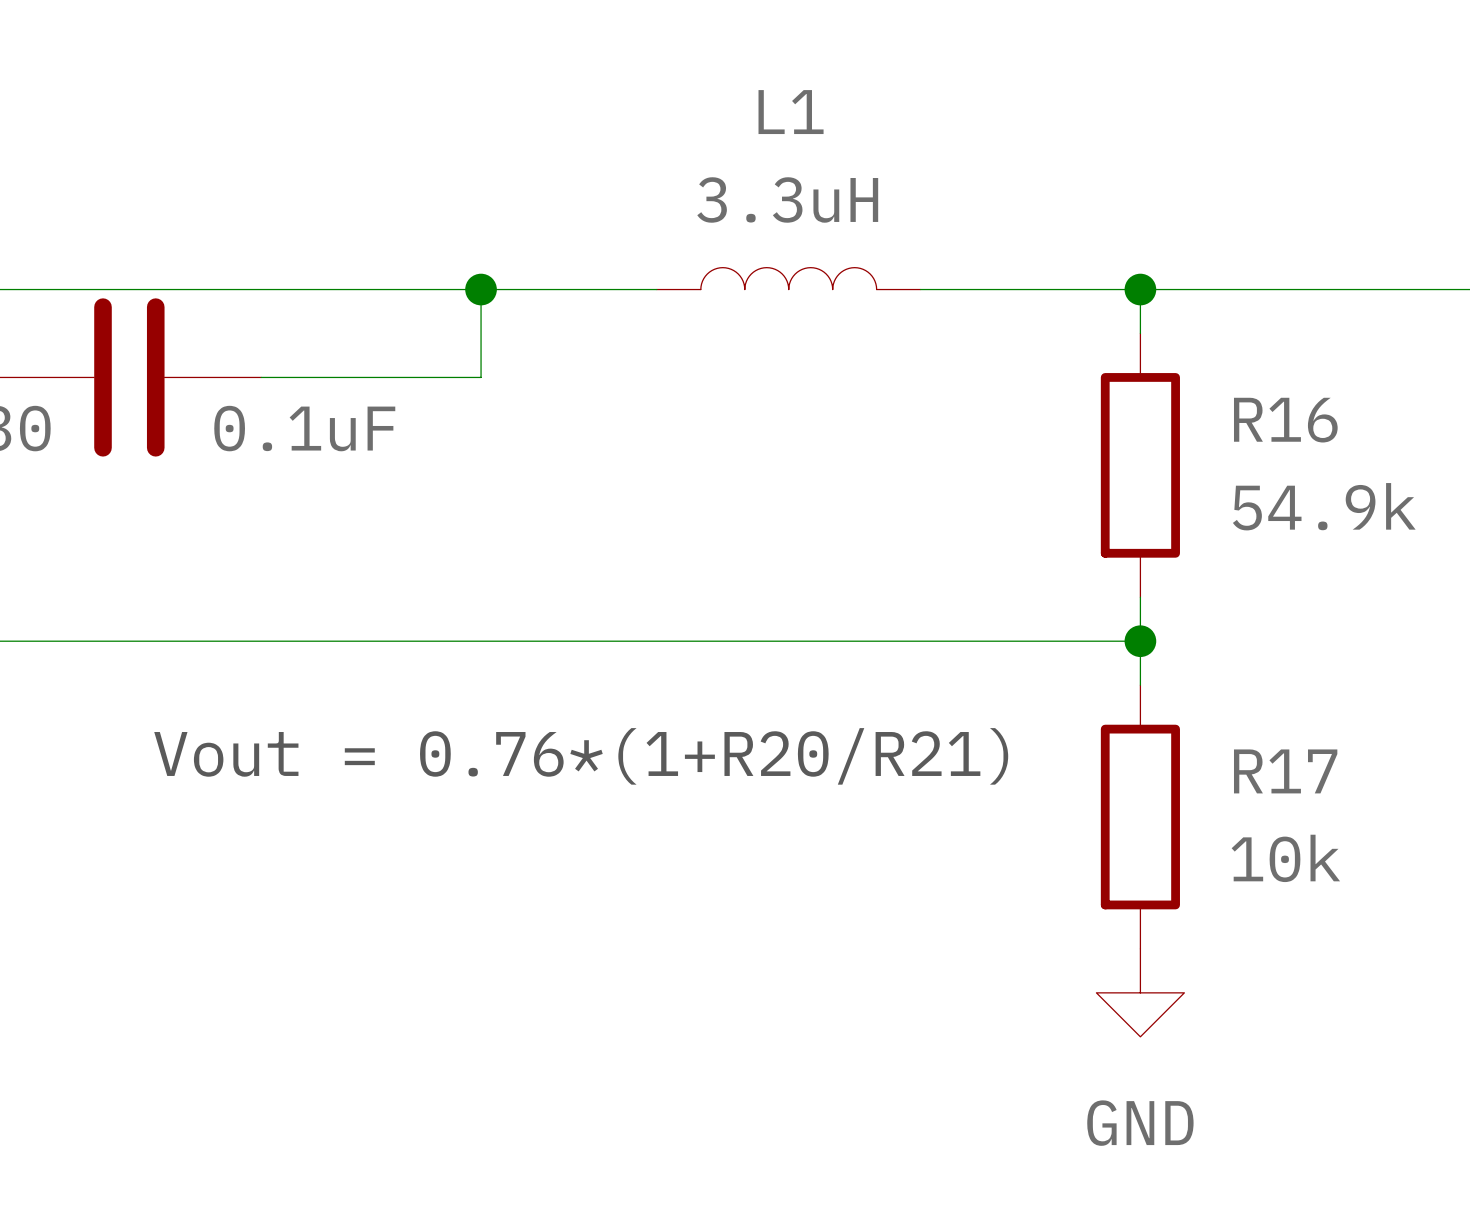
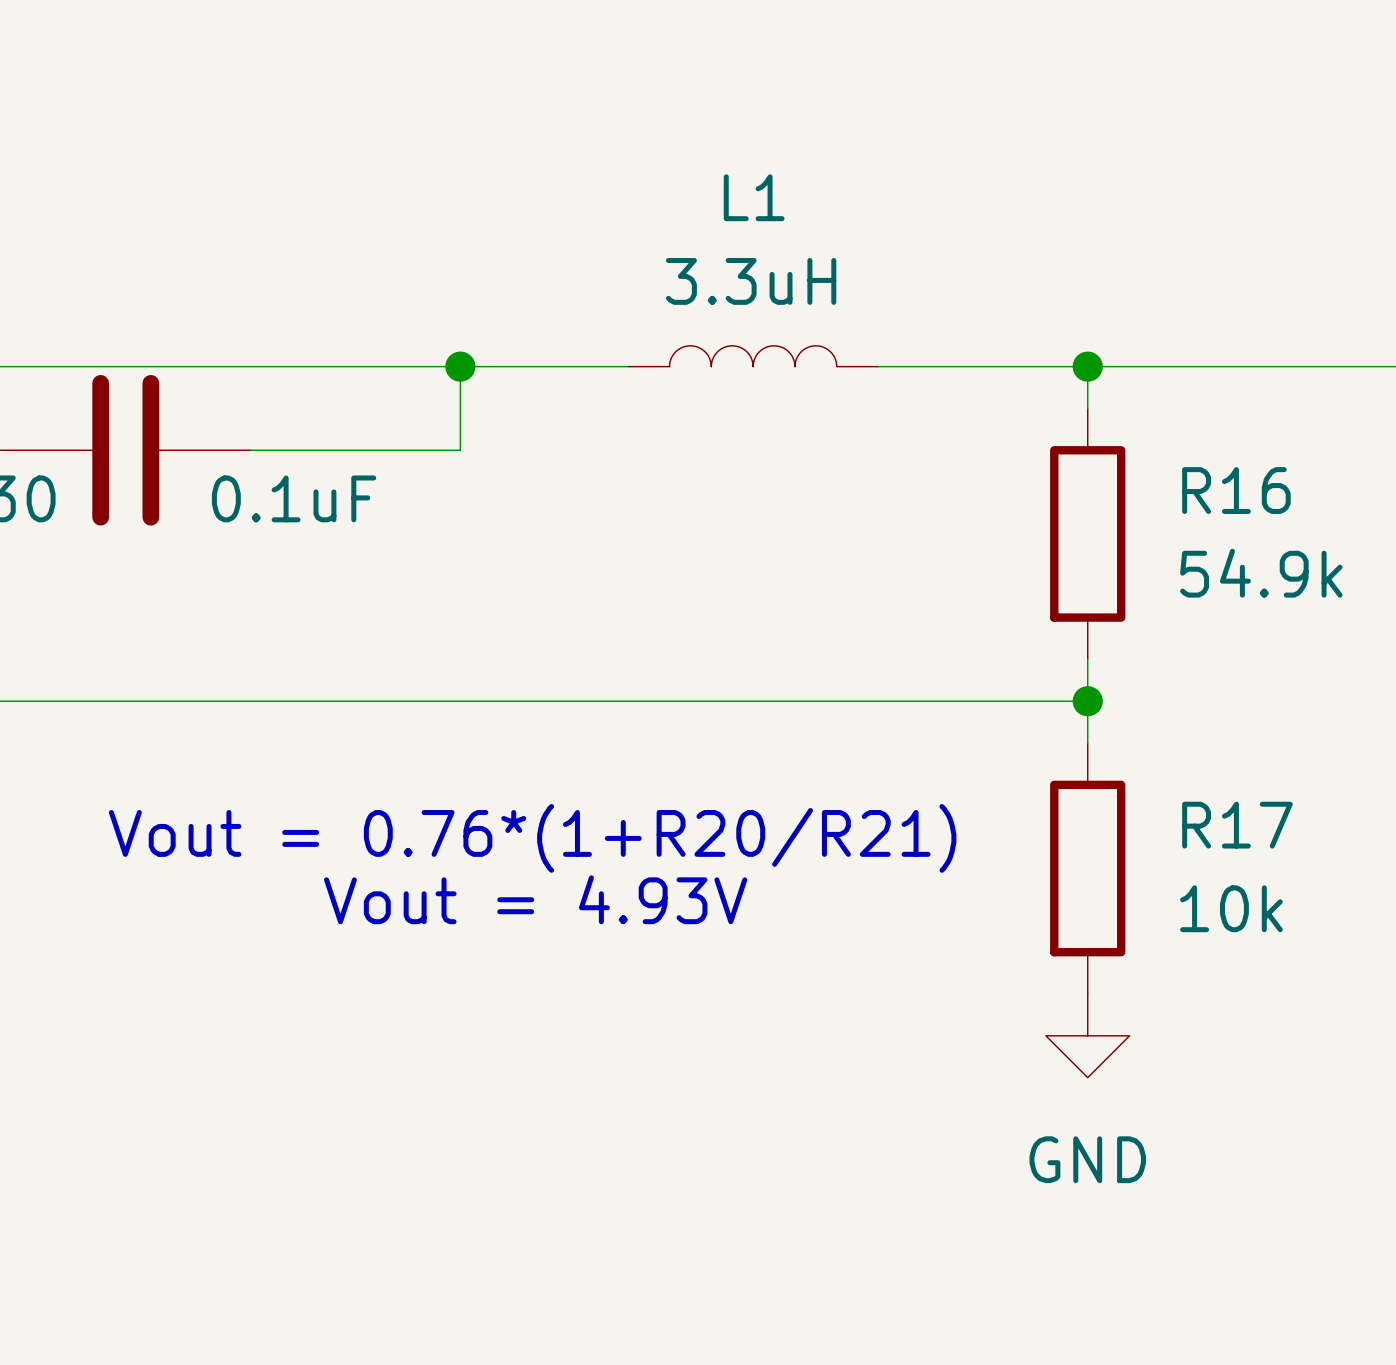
text position: Vout = 0.76*(1+R20/R21) (581, 756) -> Vout = 0.76*(1+R20/R21) (532, 838)
text: none -> Vout = 4.93V (535, 899)

